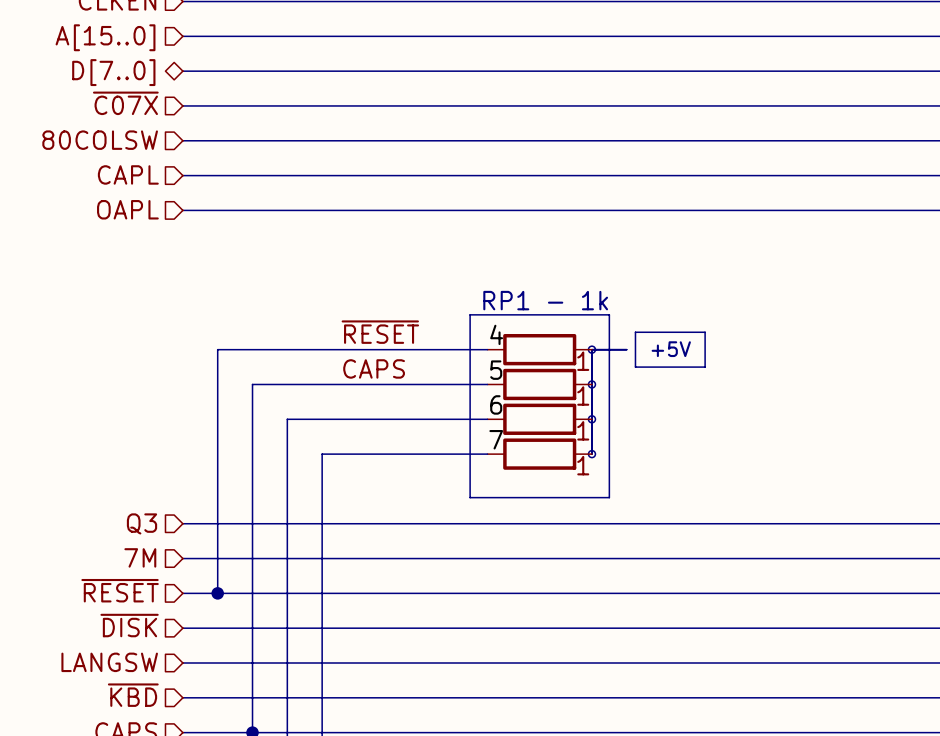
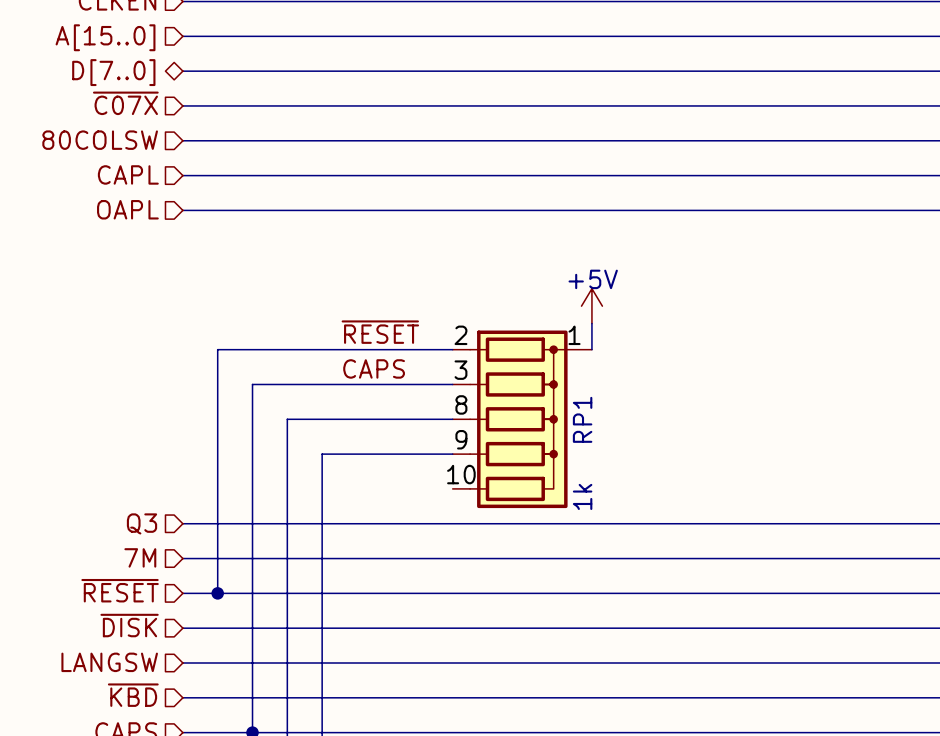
text: RP1 - 1k (545, 300) -> none
power symbol: none -> +5V (591, 306)
line: (470, 314) (609, 314) (609, 497) (470, 497) (470, 314) -> none
wire: none -> (591, 323) (591, 349)
line: (635, 332) (705, 332) (705, 367) (635, 367) (635, 332) -> none
drawing: [588, 346, 596, 354] -> none
part: (539, 349) -> none
line: (626, 349) (591, 349) (591, 454) -> none
text: +5V (671, 349) -> none
drawing: [588, 381, 596, 388] -> none
part: (539, 384) -> none
drawing: [588, 415, 596, 423] -> none
RP1: none -> 1k (522, 419)
part: (539, 419) -> none
drawing: [588, 450, 596, 458] -> none
part: (539, 454) -> none

